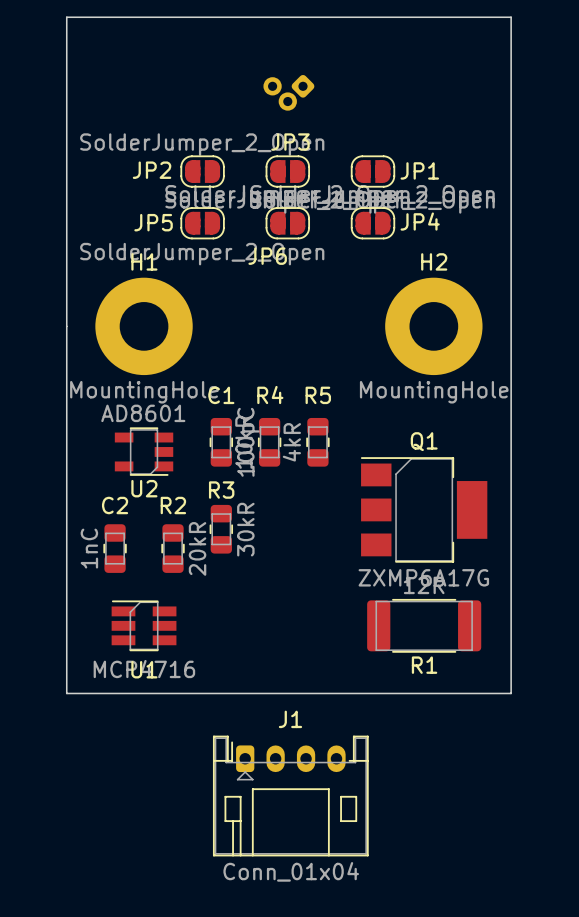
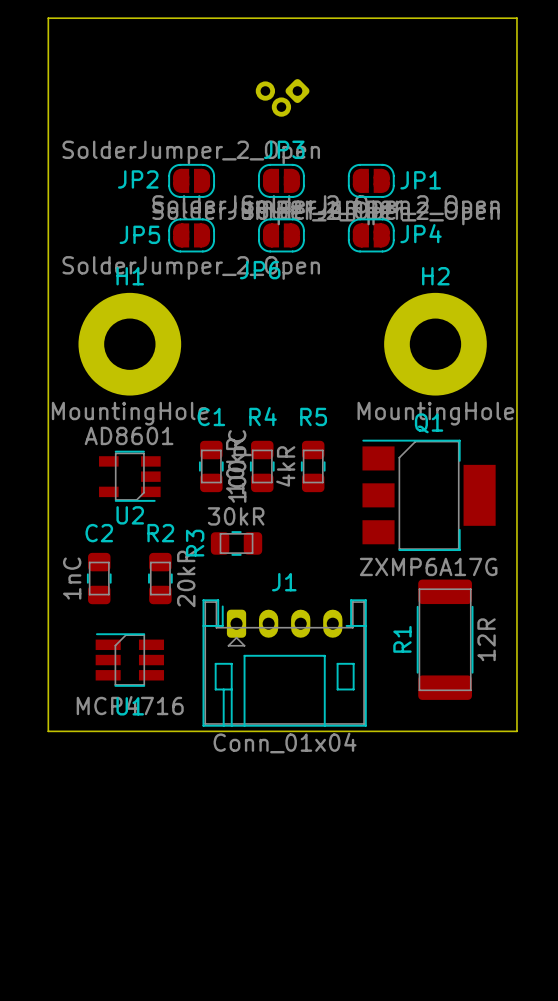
R3 name position: R3 (221, 490) -> R3 (195, 543)
Q1 position: (424, 509) -> (428, 495)
R3 rotation: 0° (221, 529) -> 90° clockwise (236, 543)
R3 value position: 30kR (245, 529) -> 30kR (236, 516)
R1 rotation: 0° (424, 625) -> 90° clockwise (445, 639)
J1 position: (290, 796) -> (284, 663)

